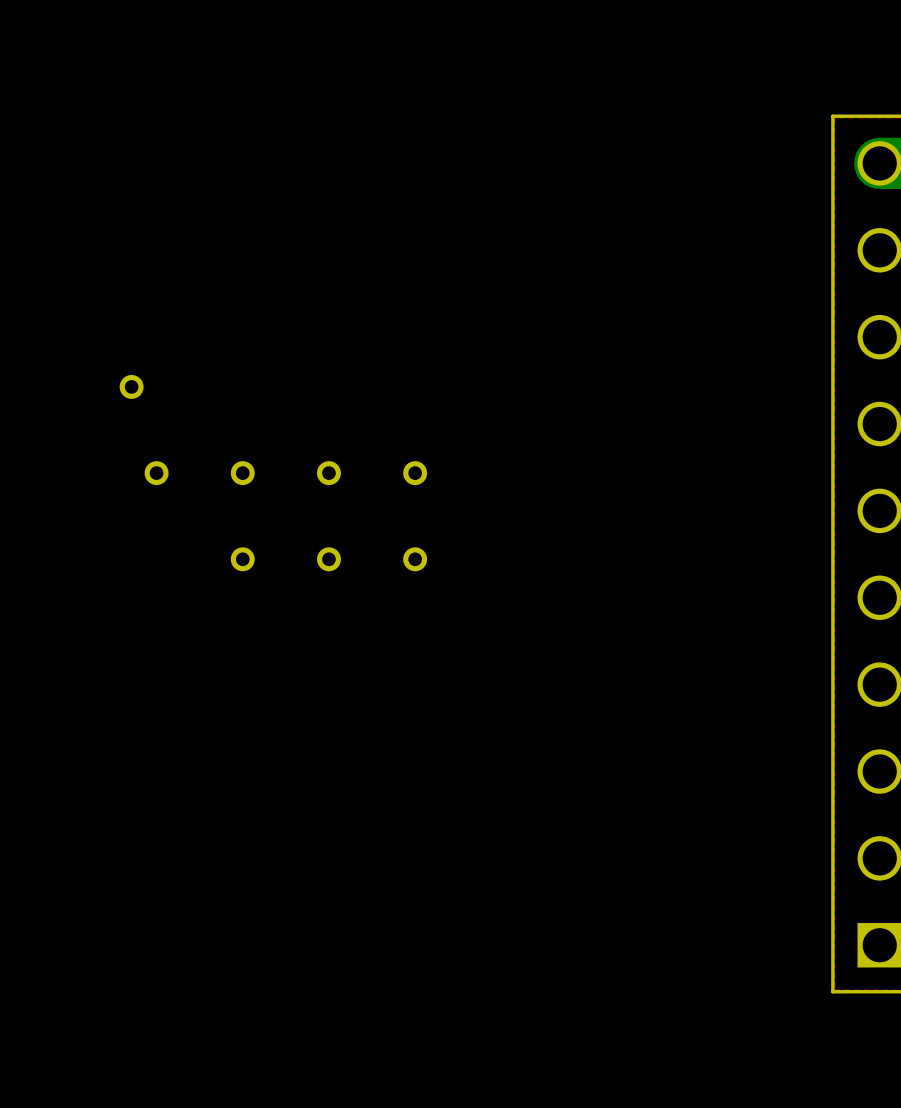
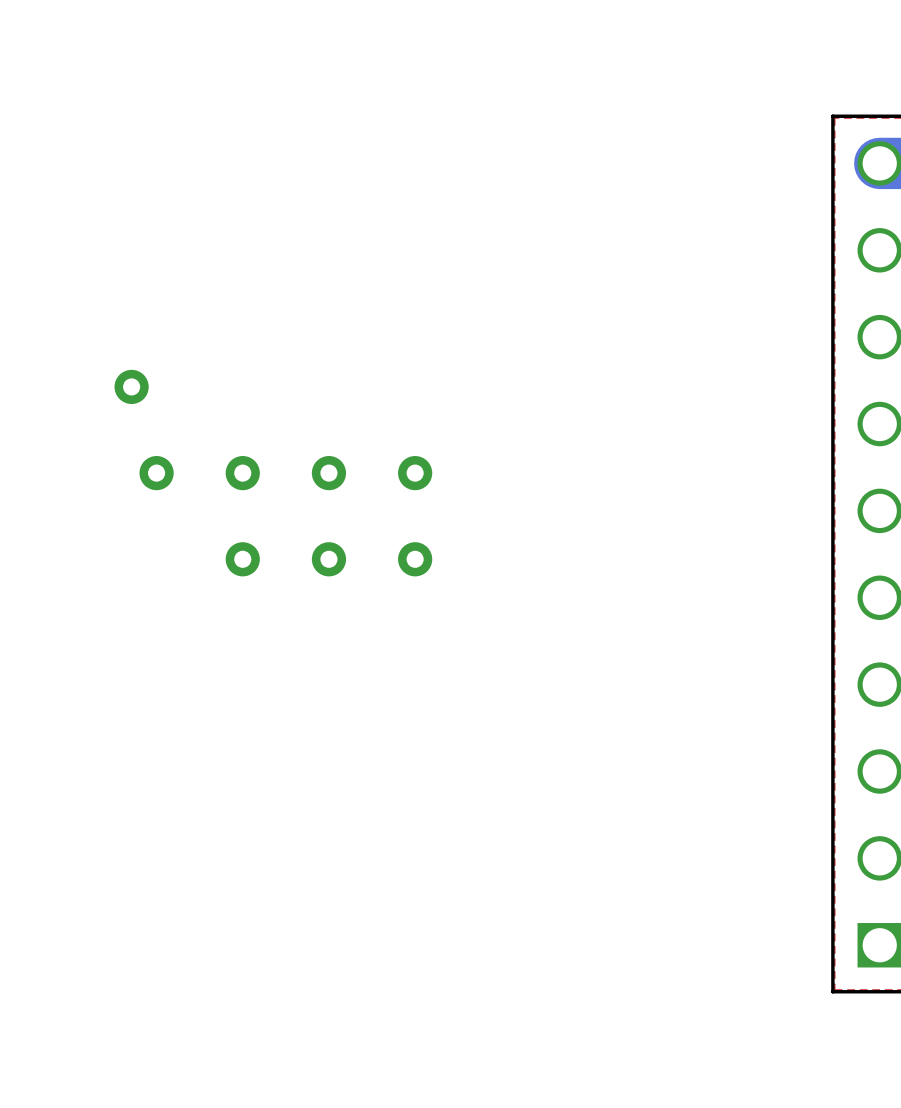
part footprint: [119, 374, 144, 399] -> [114, 369, 149, 405]
part footprint: [144, 461, 169, 486] -> [139, 456, 174, 491]
part footprint: [230, 461, 255, 486] -> [225, 456, 260, 491]
part footprint: [316, 461, 341, 486] -> [311, 456, 347, 491]
part footprint: [403, 461, 428, 486] -> [398, 456, 433, 491]
part footprint: [230, 547, 255, 572] -> [225, 542, 260, 577]
part footprint: [316, 547, 341, 572] -> [311, 542, 347, 577]
part footprint: [403, 547, 428, 572] -> [398, 542, 433, 577]

